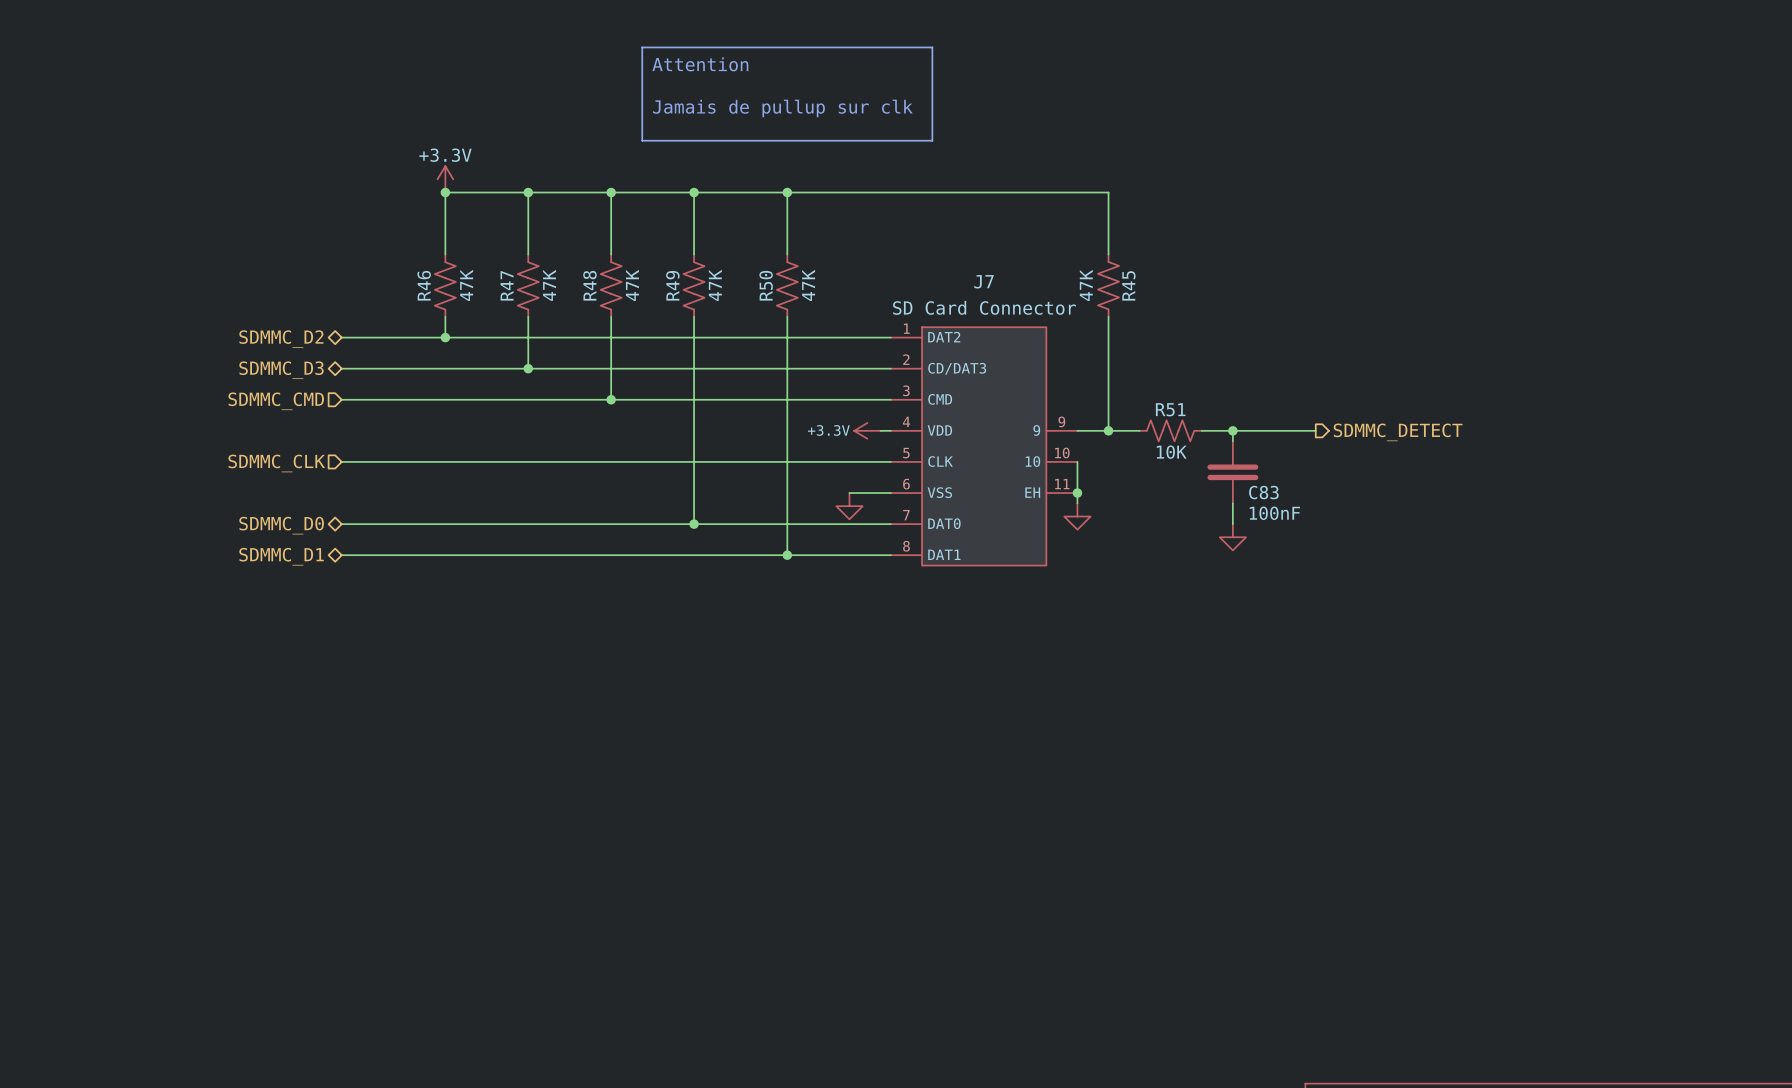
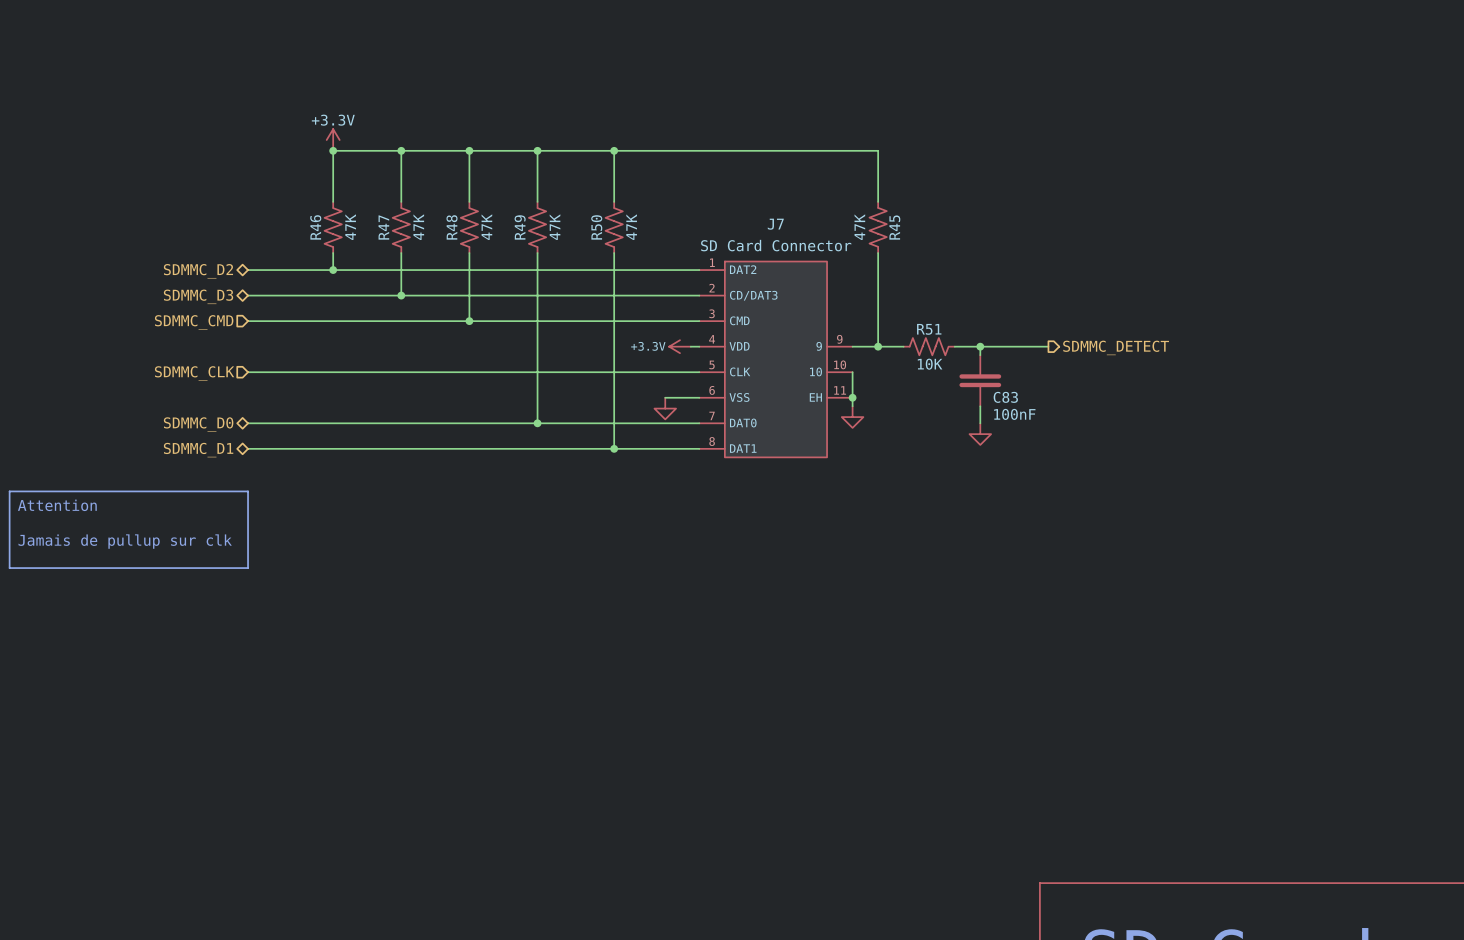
line: (642, 47) (932, 47) (932, 140) (642, 140) (642, 47) -> none
text: Attention (700, 64) -> none
text: Jamais de pullup sur clk (782, 108) -> none
line: none -> (9, 491) (248, 491) (248, 568) (9, 568) (9, 491)
text: none -> Attention (57, 505)
text: none -> Jamais de pullup sur clk (125, 541)

